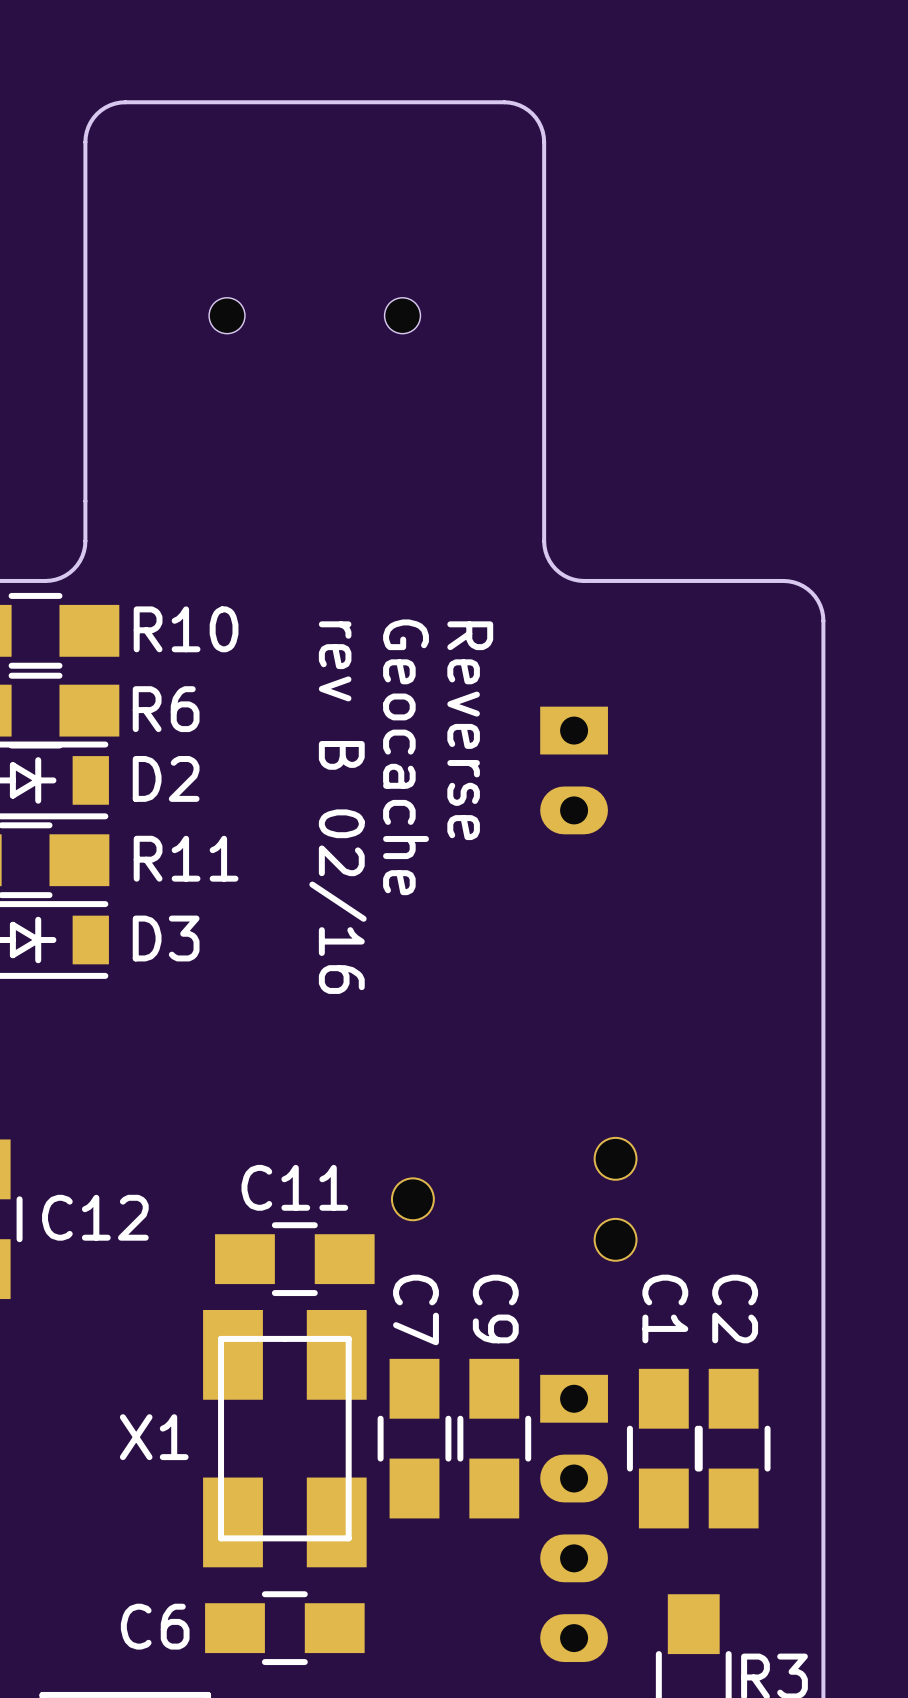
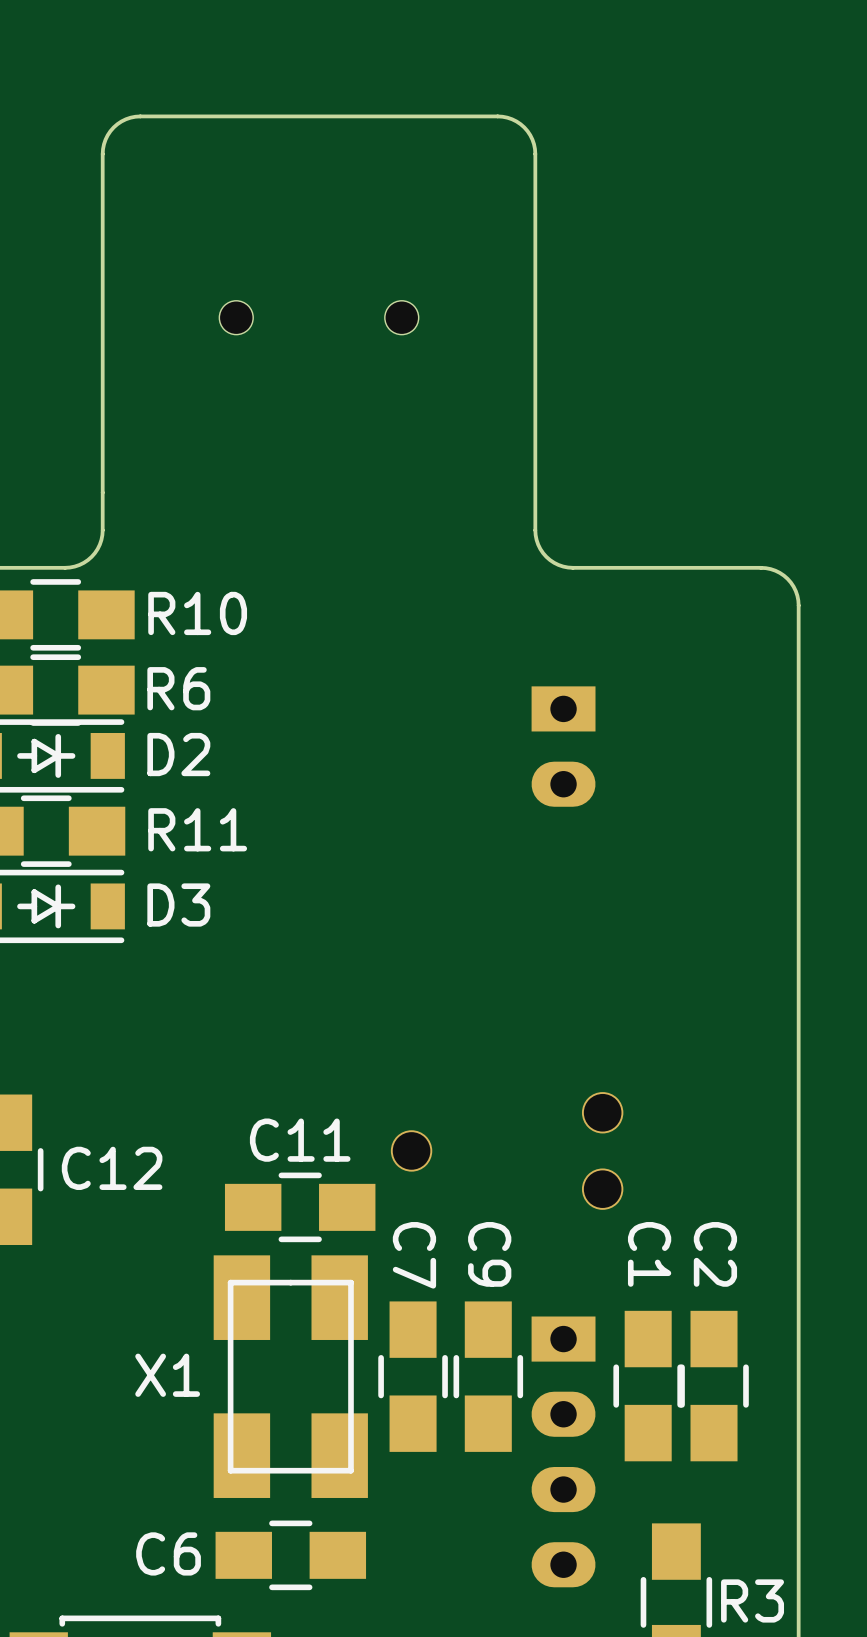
text: Reverse (470, 730) -> none
text: Geocache (406, 757) -> none
text: rev B 02/16 (338, 807) -> none

